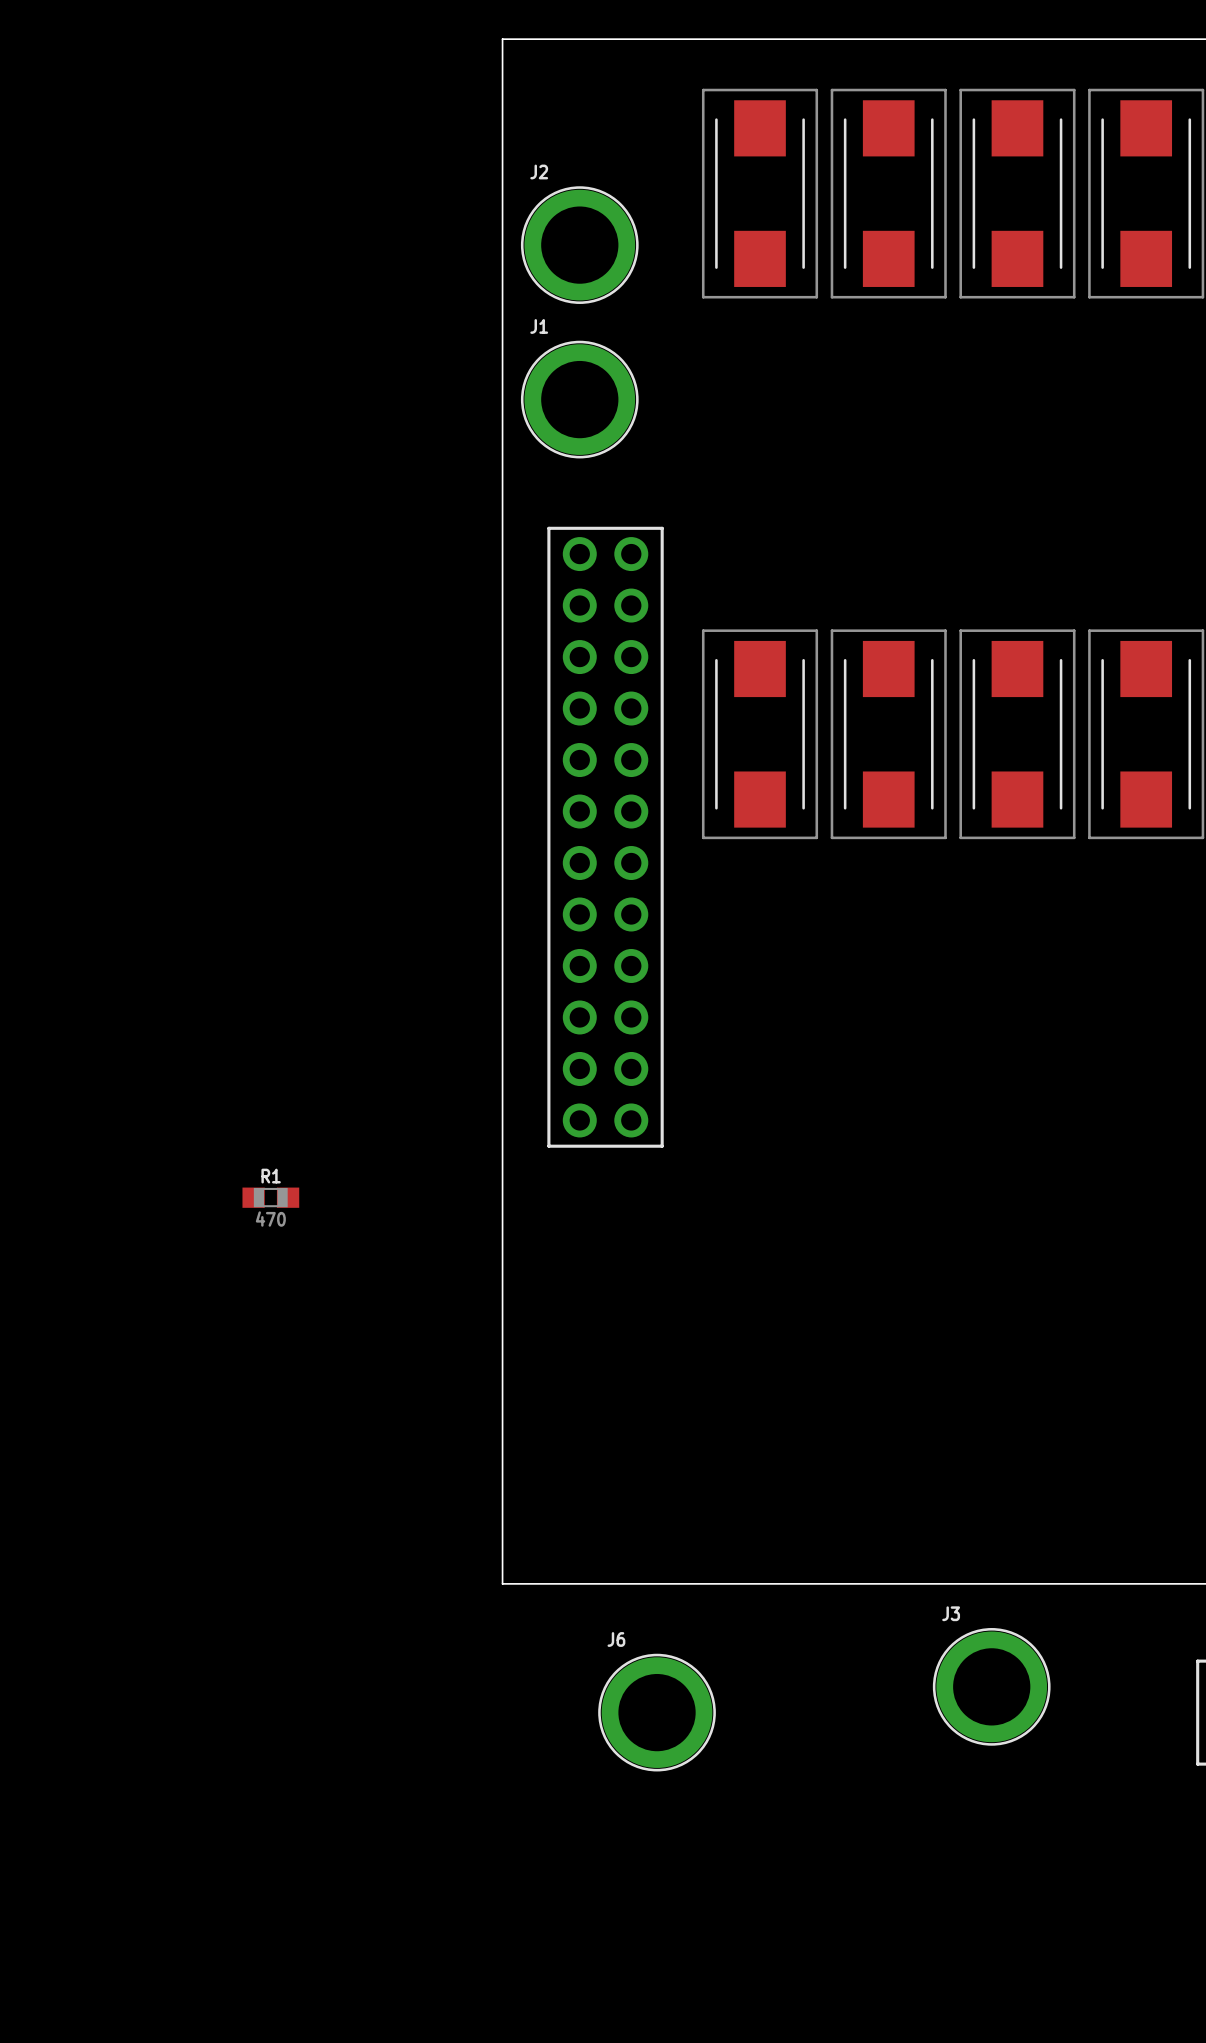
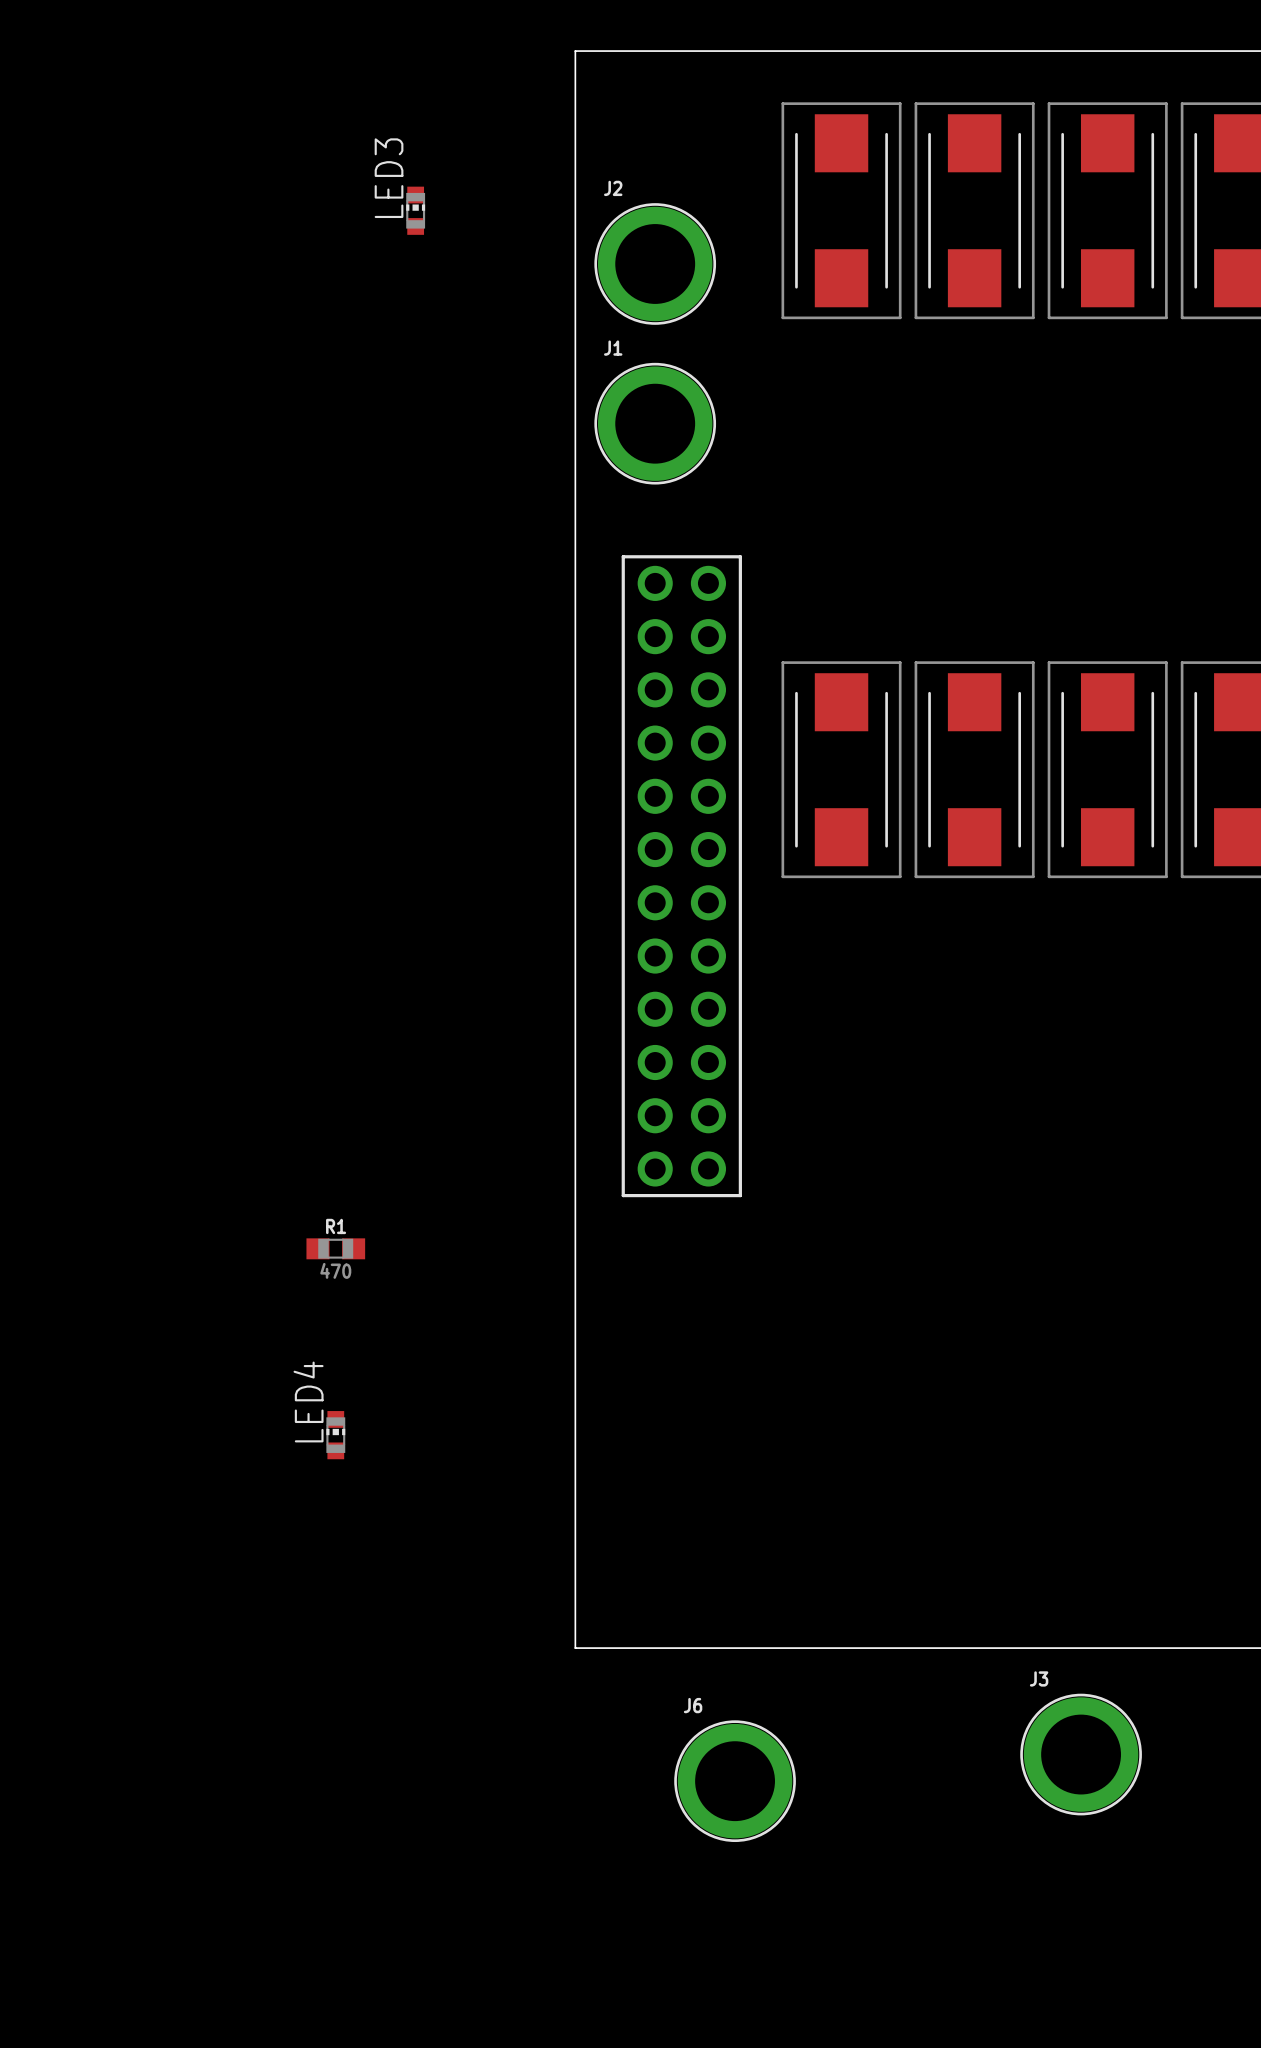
LED3: none -> (415, 210)
LED4: none -> (335, 1435)

